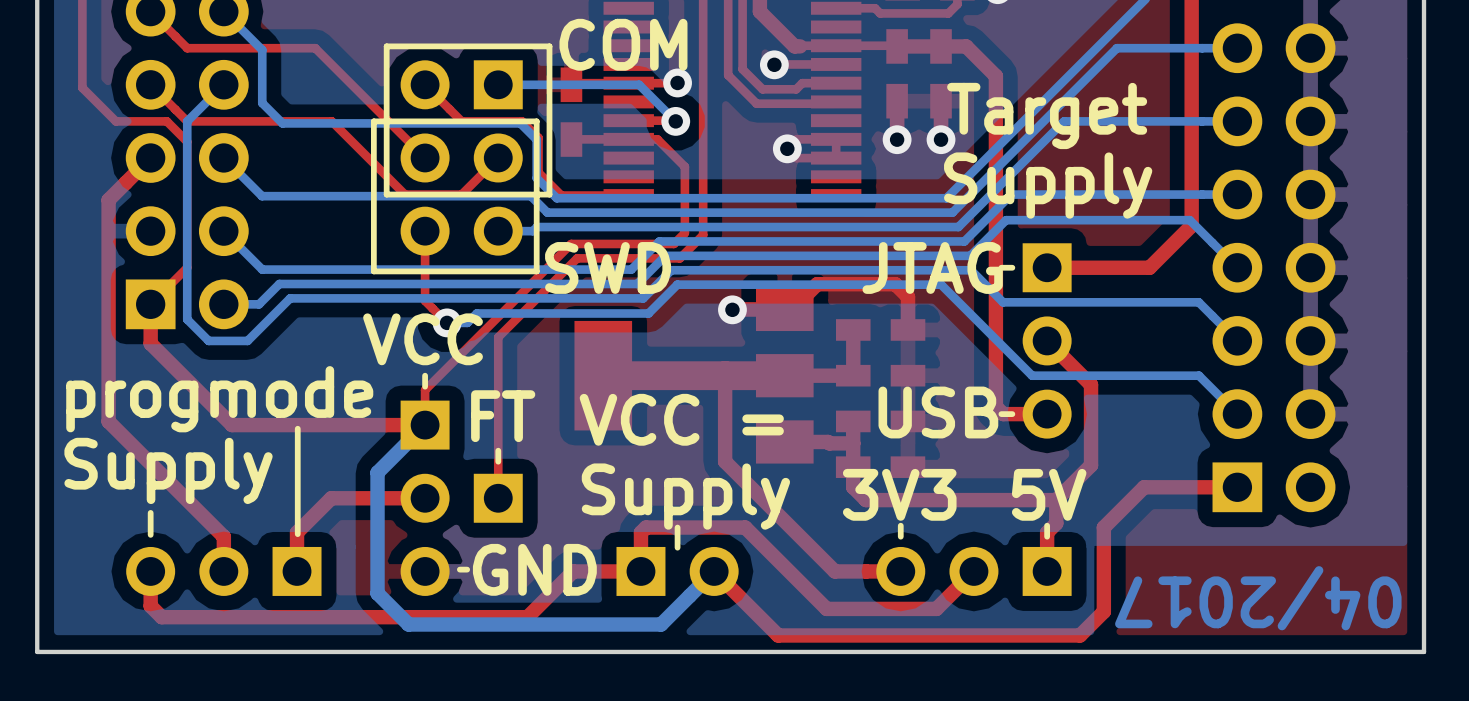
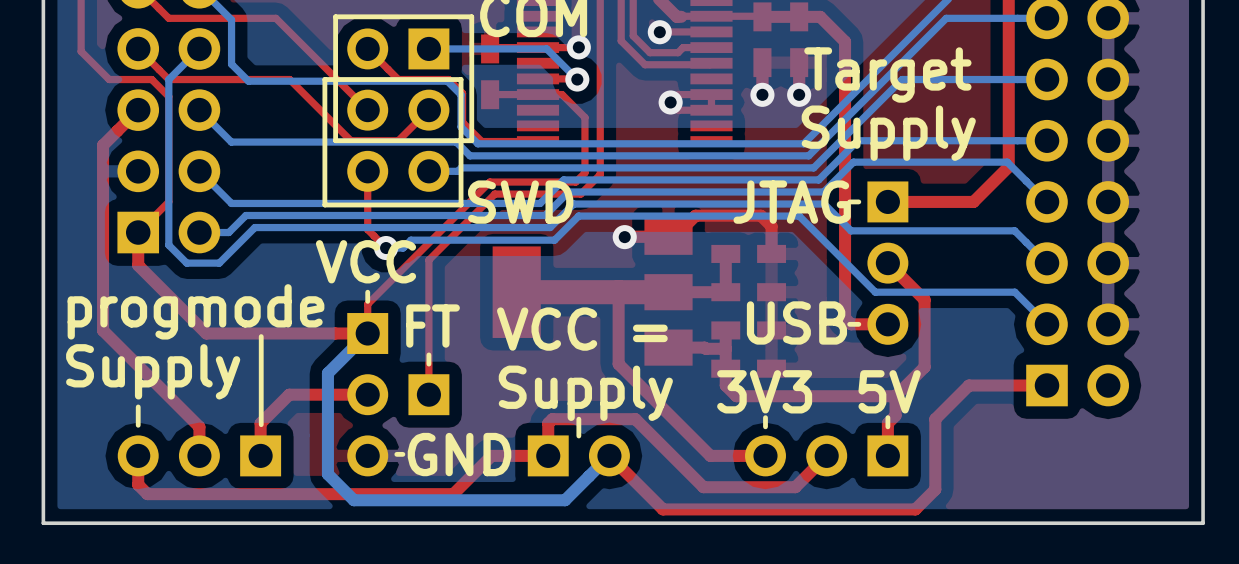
text: 04/2017 (1258, 598) -> none

